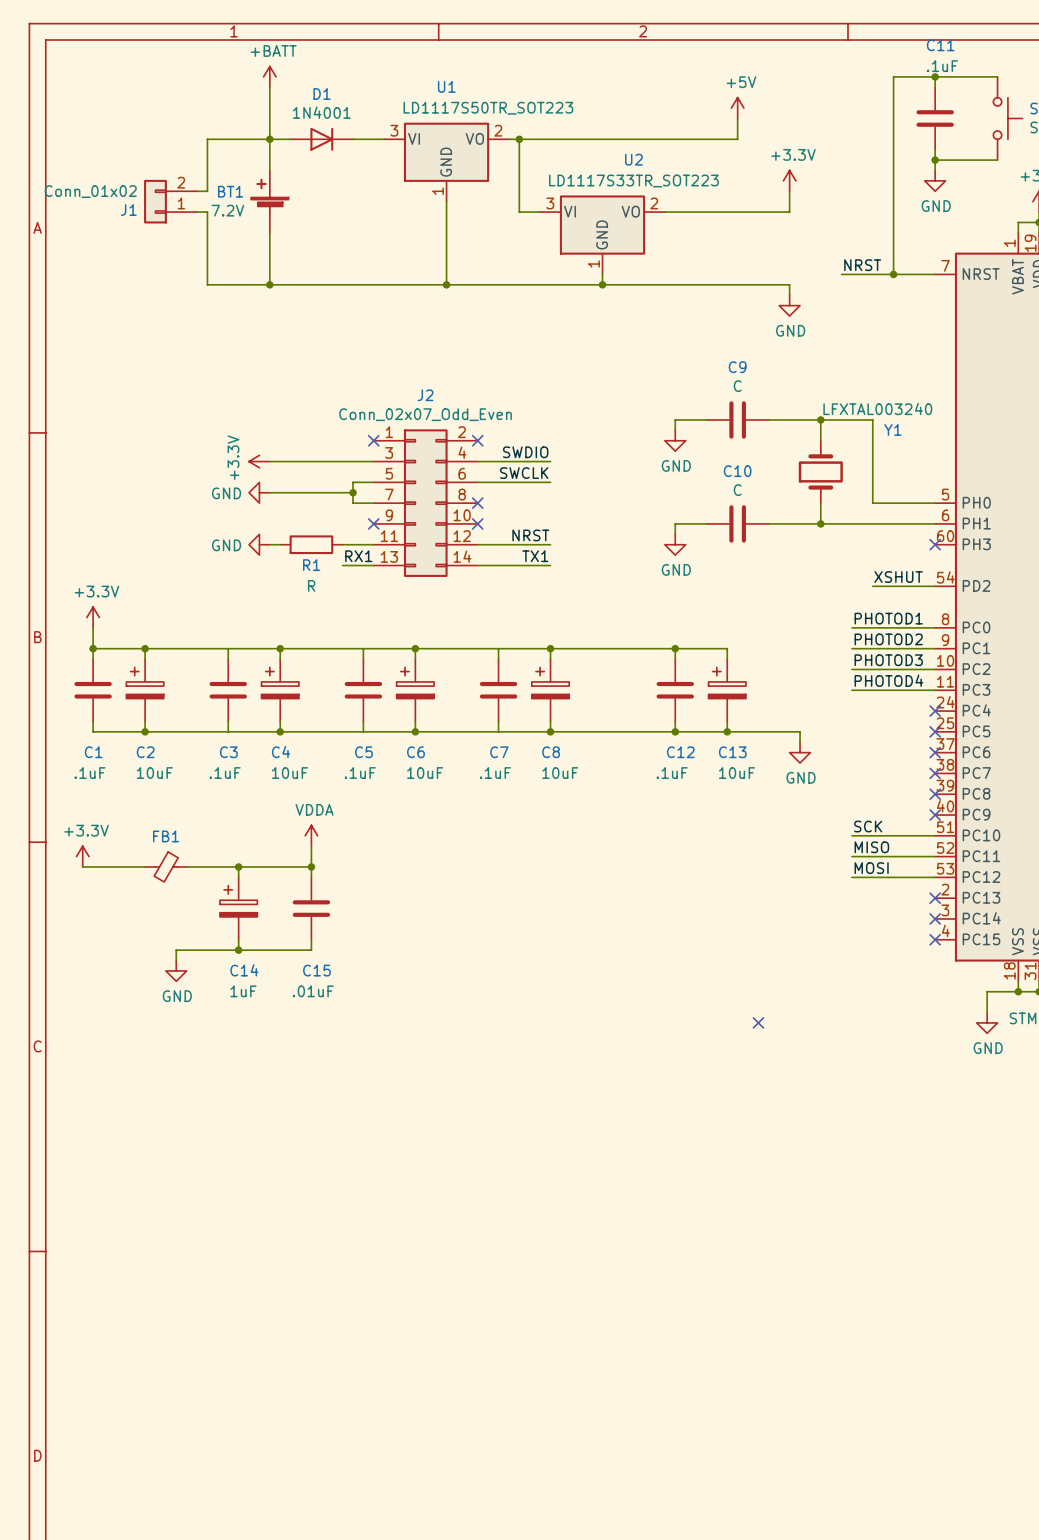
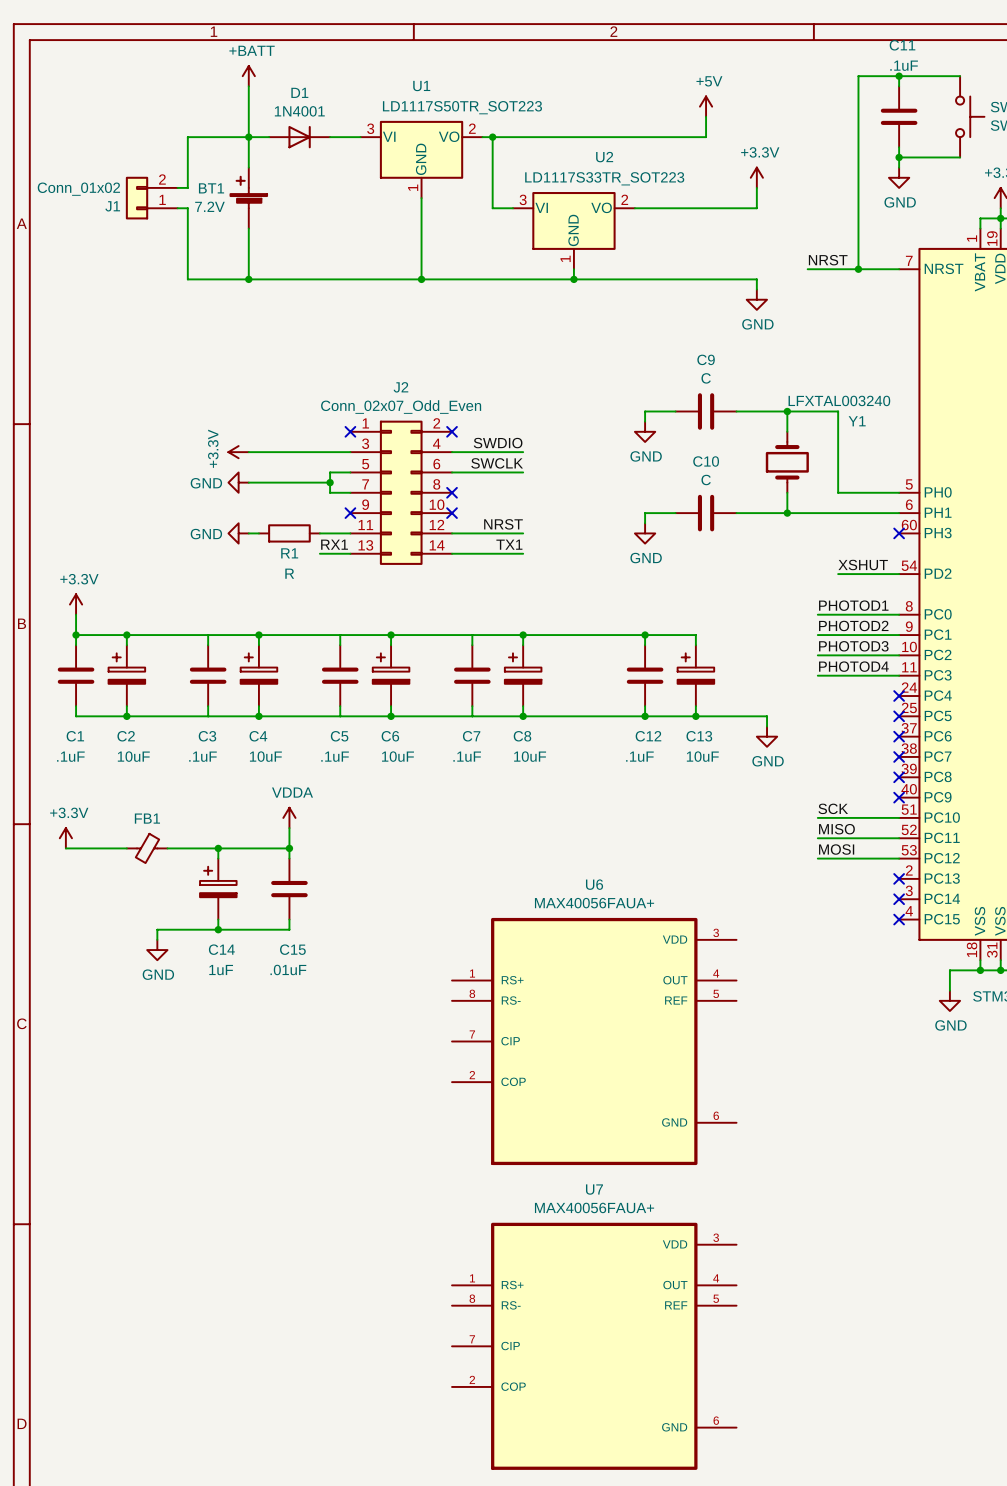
no-connect mark: (758, 1022) -> none
U6: none -> MAX40056FAUA+ (594, 1041)
U7: none -> MAX40056FAUA+ (594, 1346)

